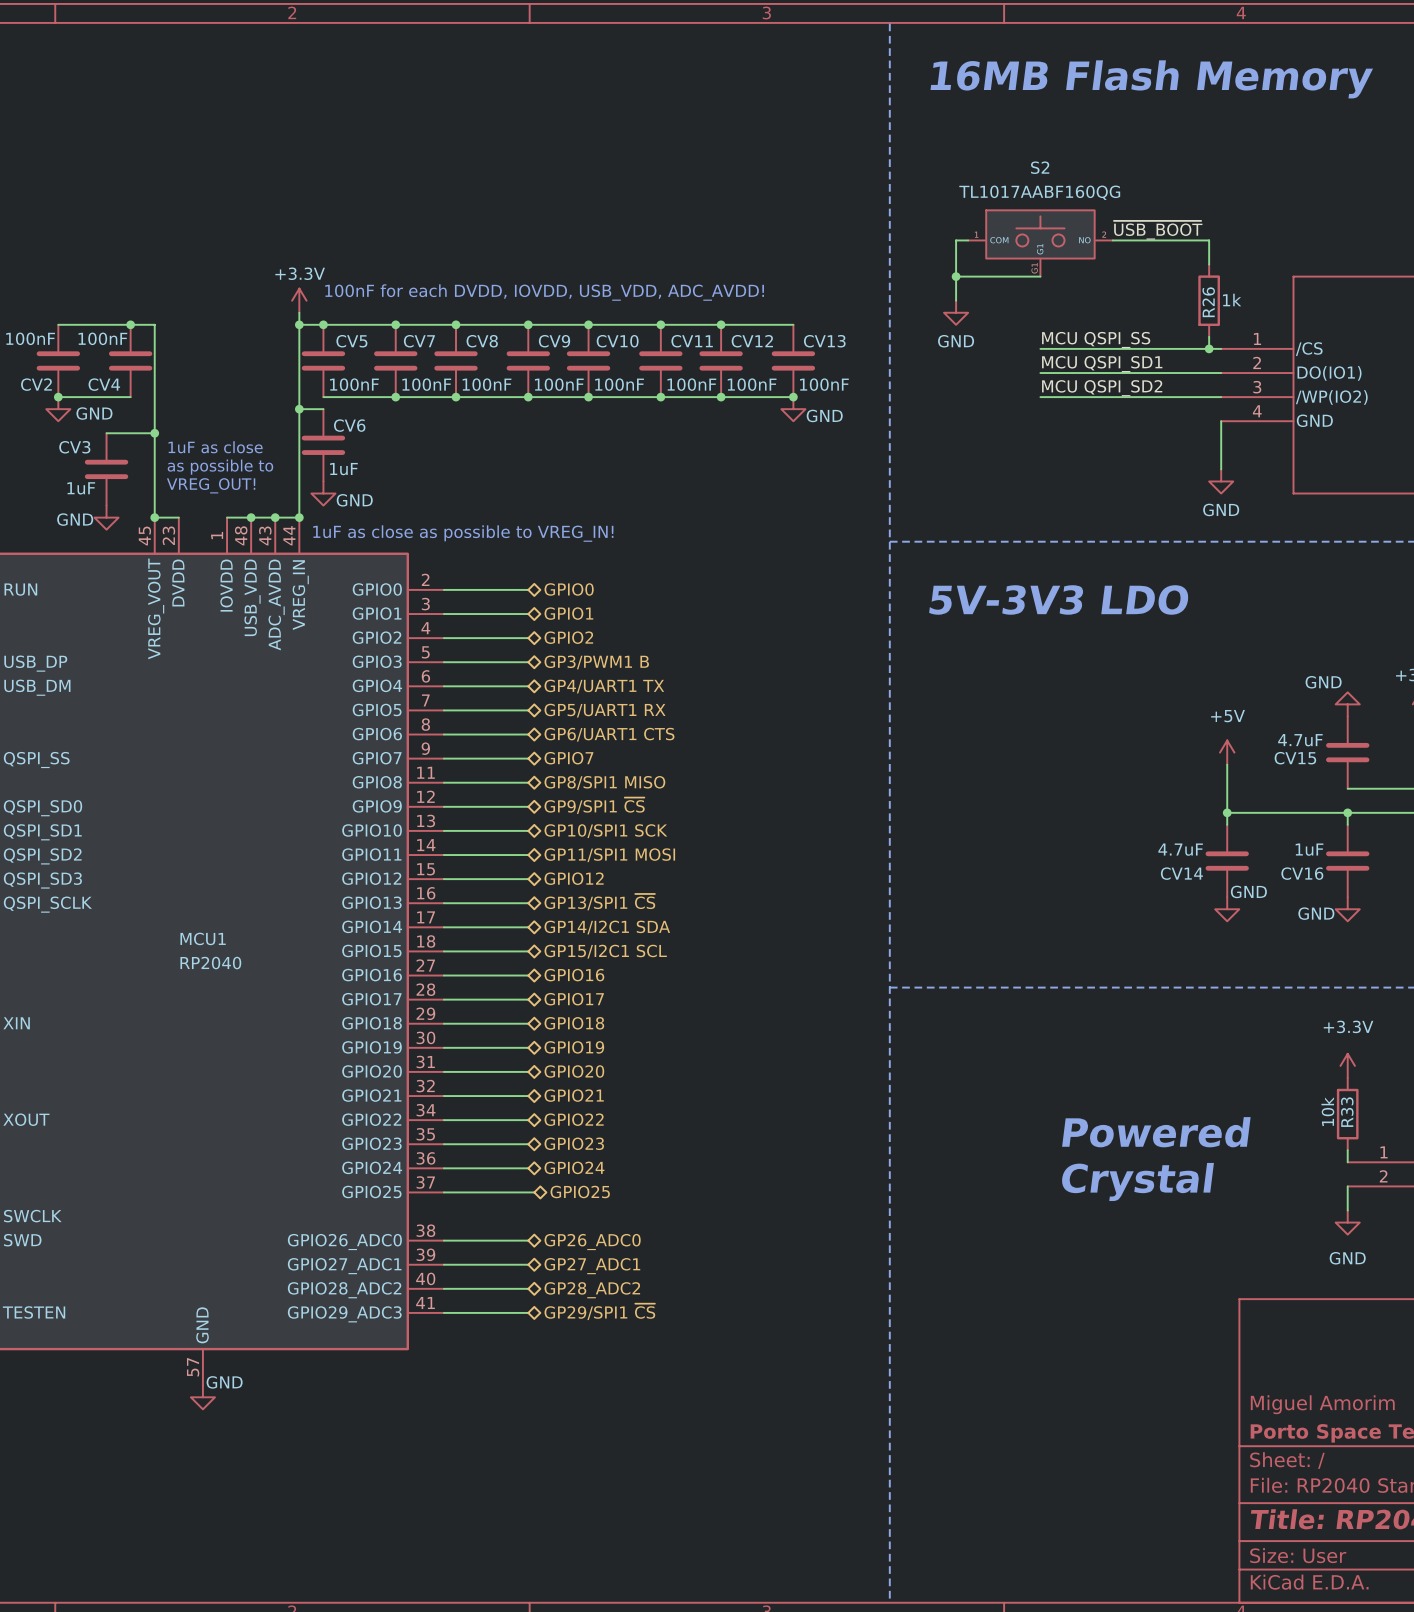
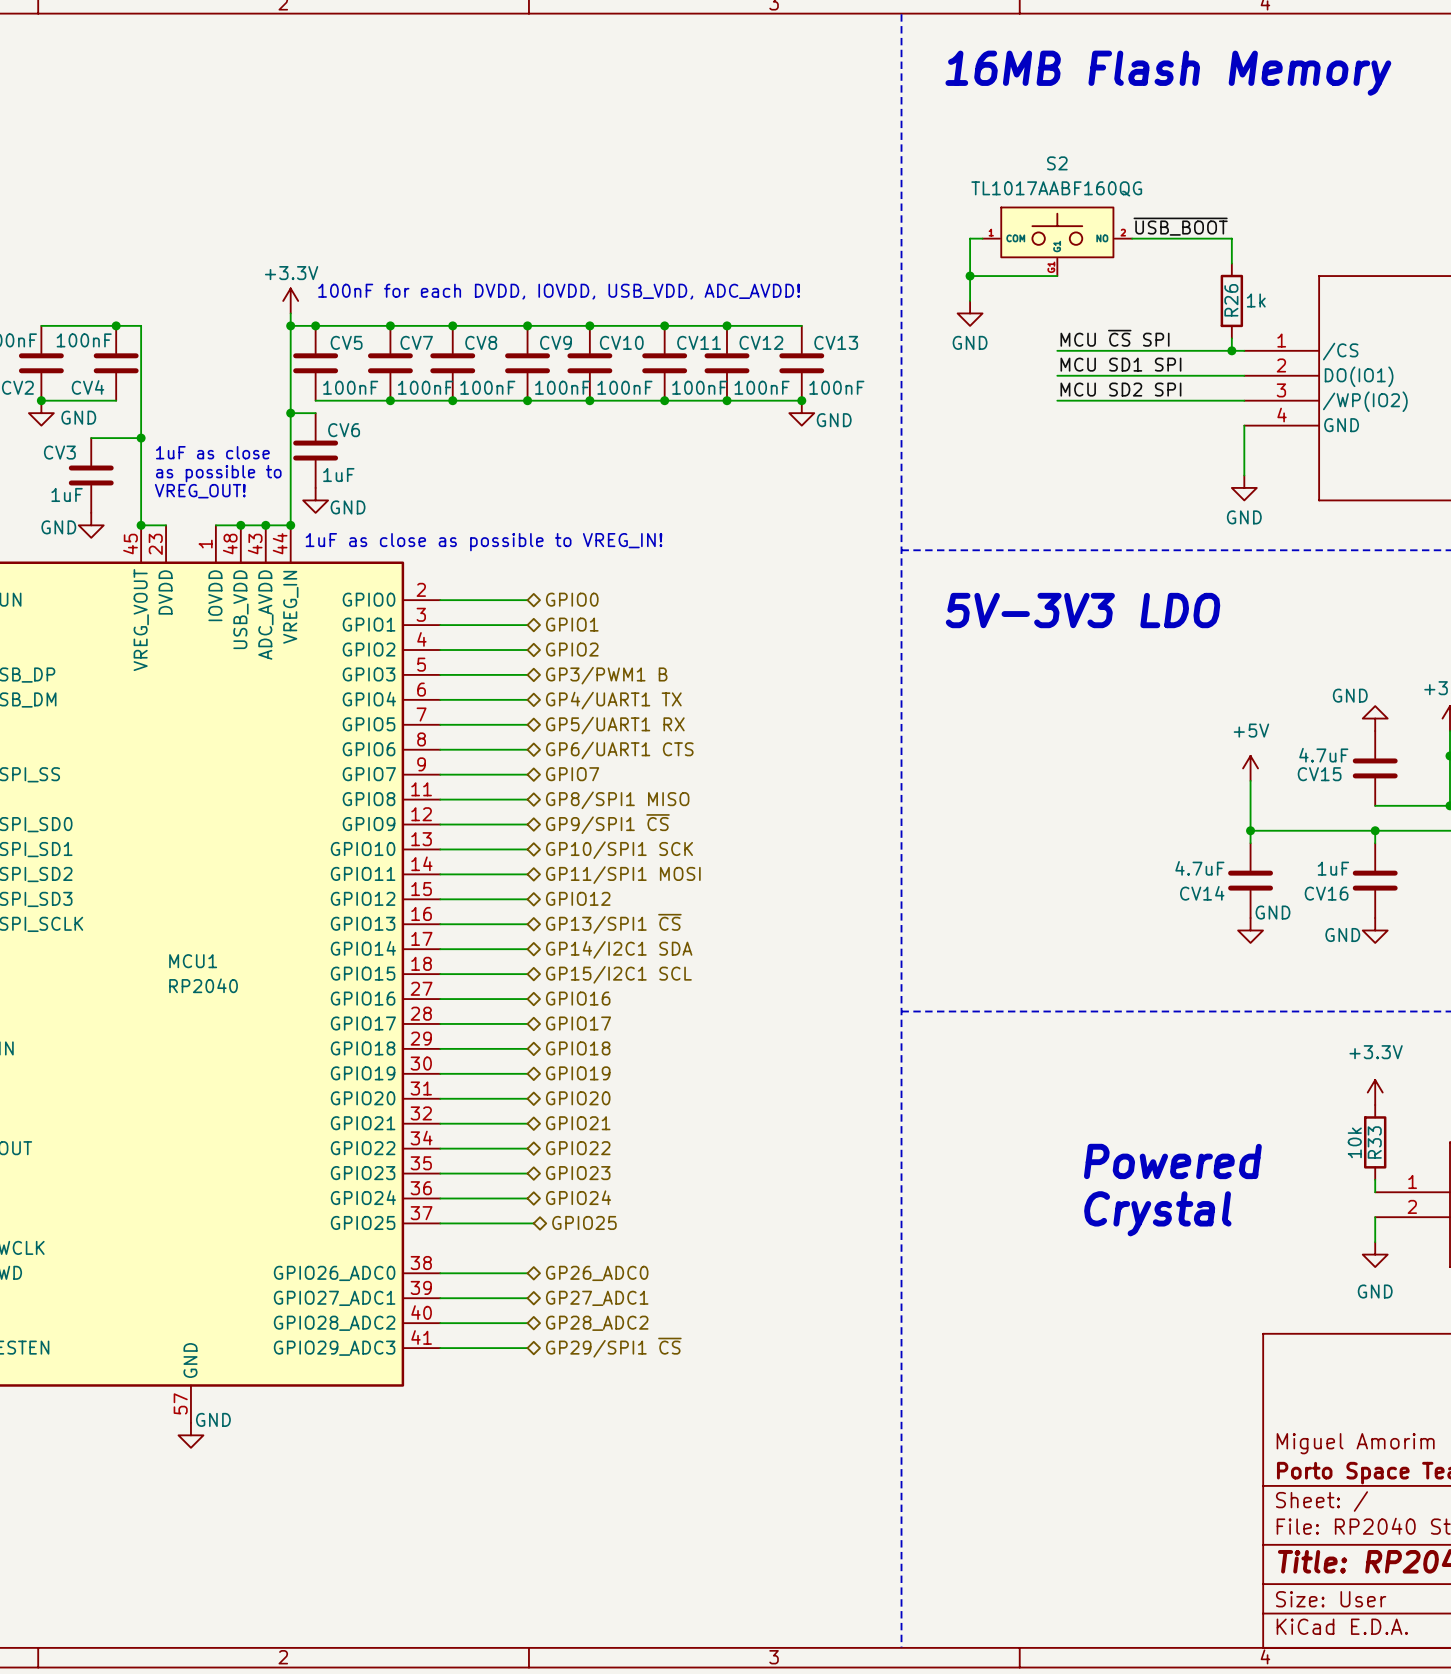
label: MCU QSPI_SS (1096, 339) -> MCU ~{CS} SPI (1115, 338)
label: MCU QSPI_SD1 (1102, 364) -> MCU SD1 SPI (1120, 364)
label: MCU QSPI_SD2 (1102, 388) -> MCU SD2 SPI (1120, 389)

